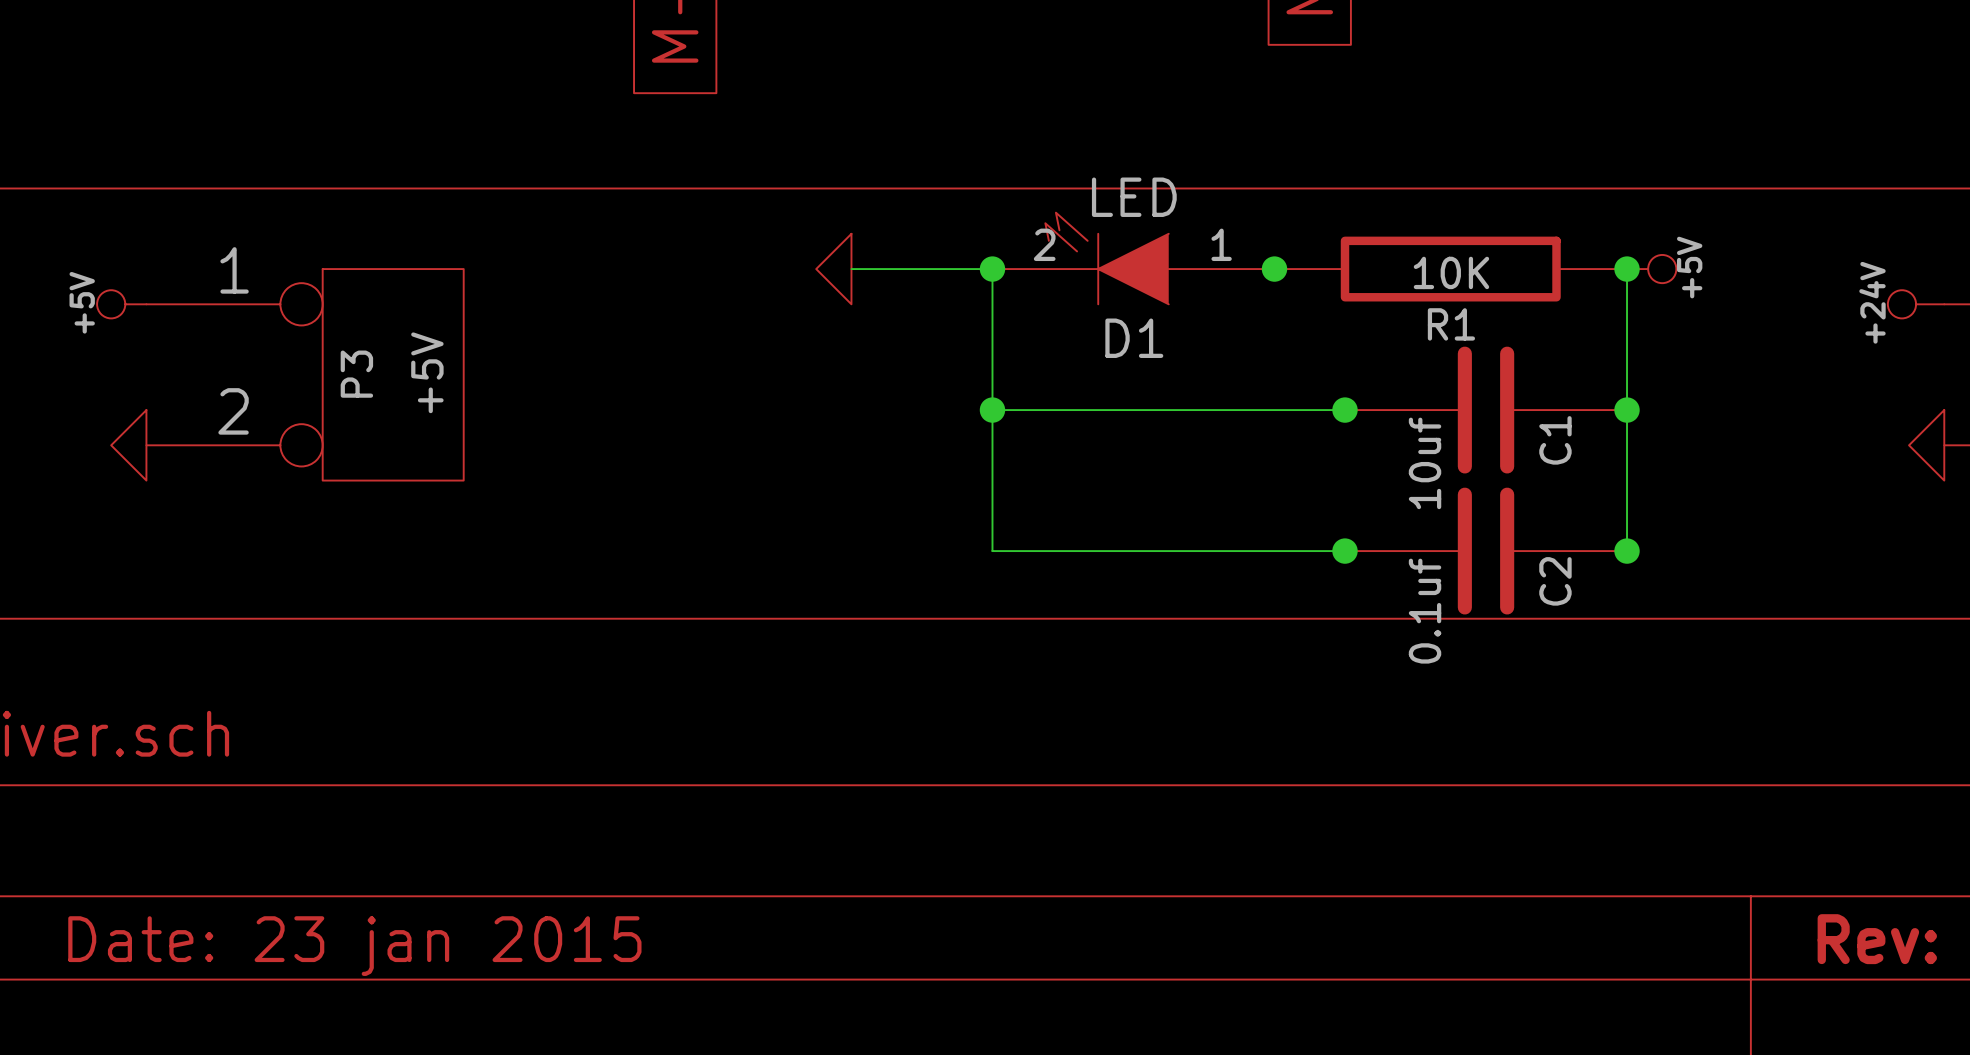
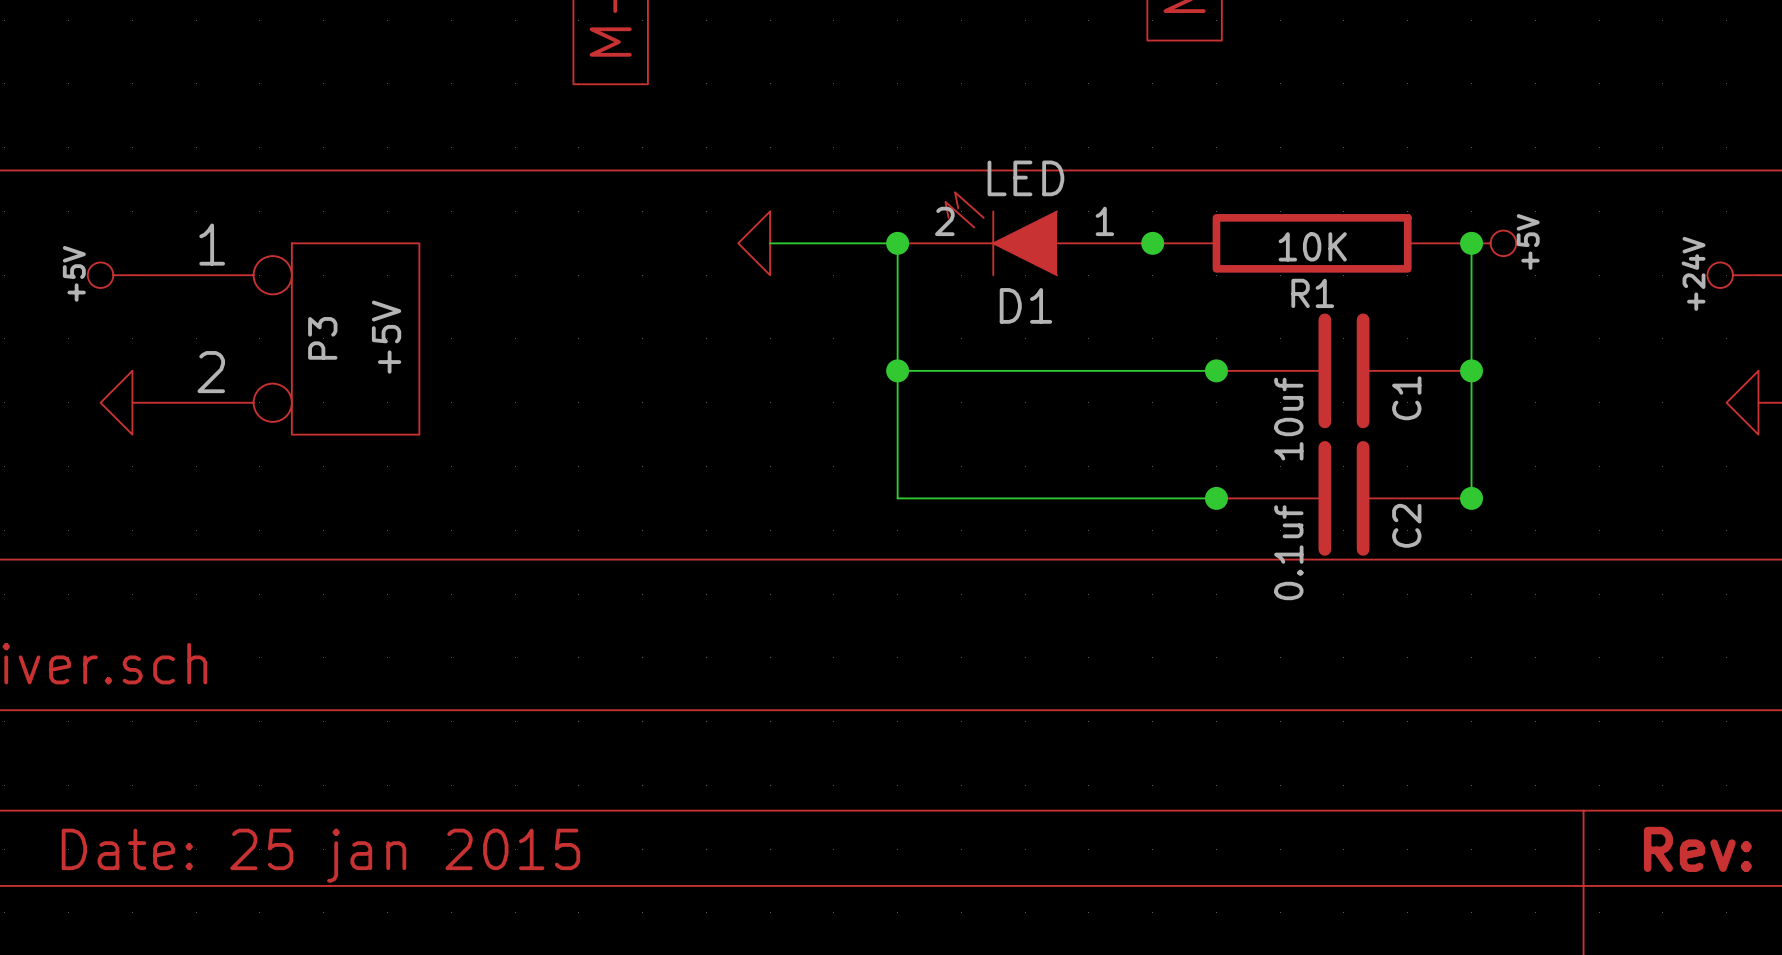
title block: Date: 23 jan 2015 (354, 946) -> Date: 25 jan 2015 (320, 855)

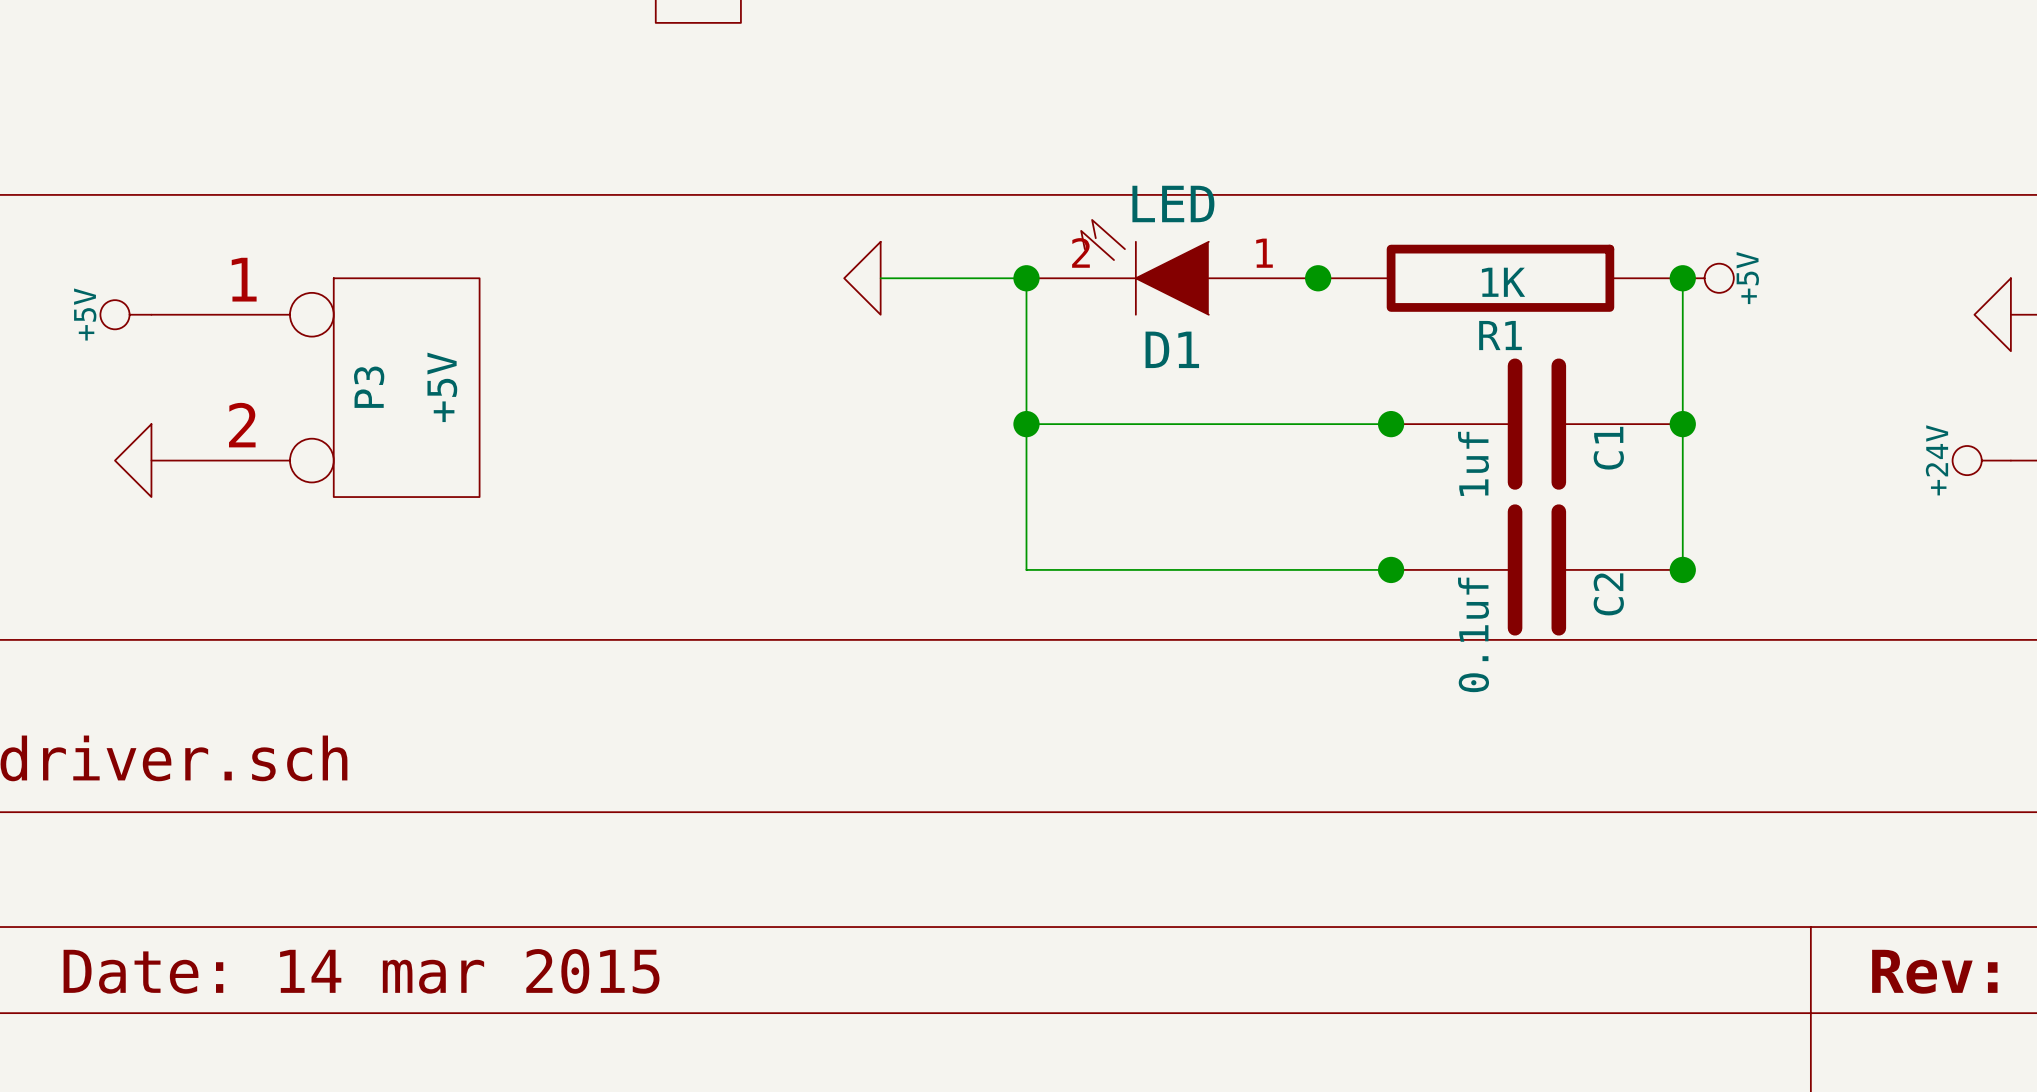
R1 value: 10K (1312, 246) -> 1K (1503, 282)
power symbol shape: [1707, 262, 1759, 288] -> [1974, 278, 2011, 352]
power symbol text: +24V (1693, 273) -> none
power symbol shape: [1726, 370, 1759, 435] -> [1952, 445, 2011, 476]
power symbol text: none -> +24V (1936, 460)
C1 value: 10uf (1288, 419) -> 1uf (1473, 463)
title block: Date: 25 jan 2015 (320, 855) -> Date: 14 mar 2015 (361, 971)

